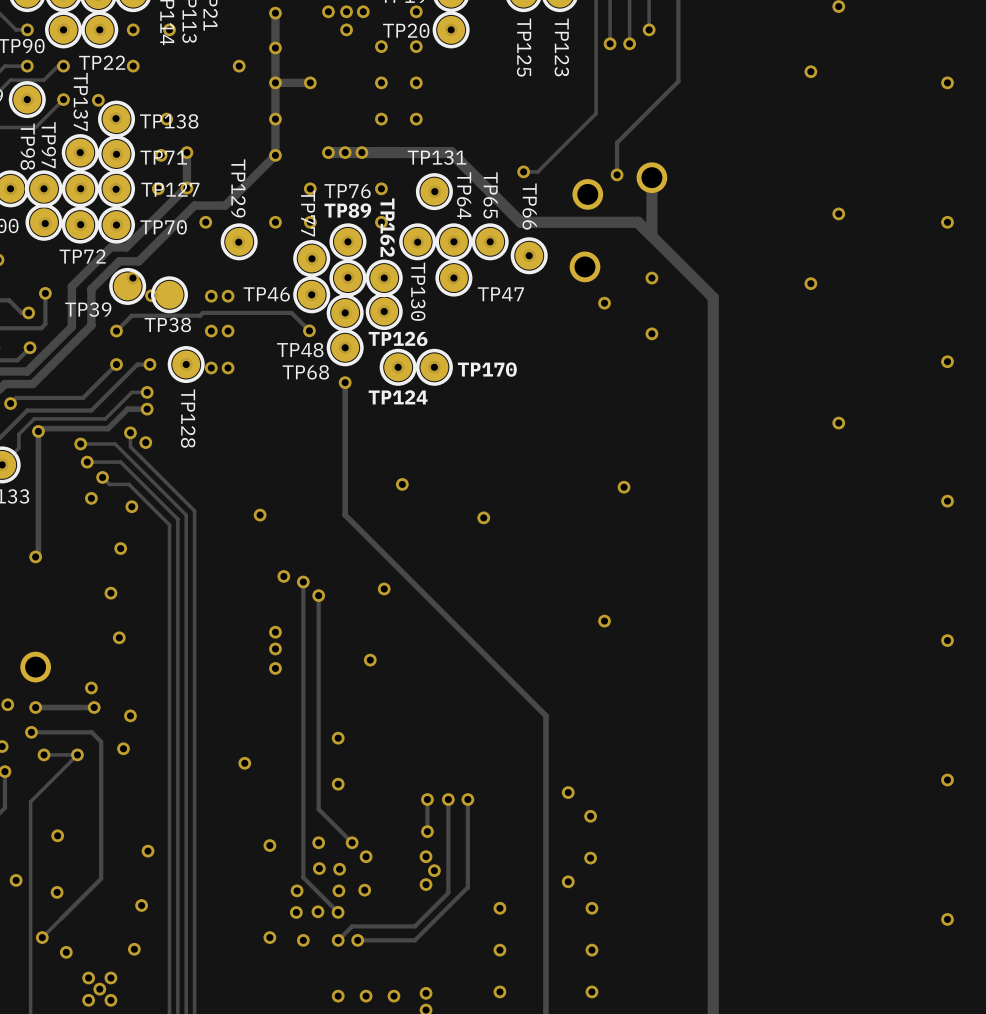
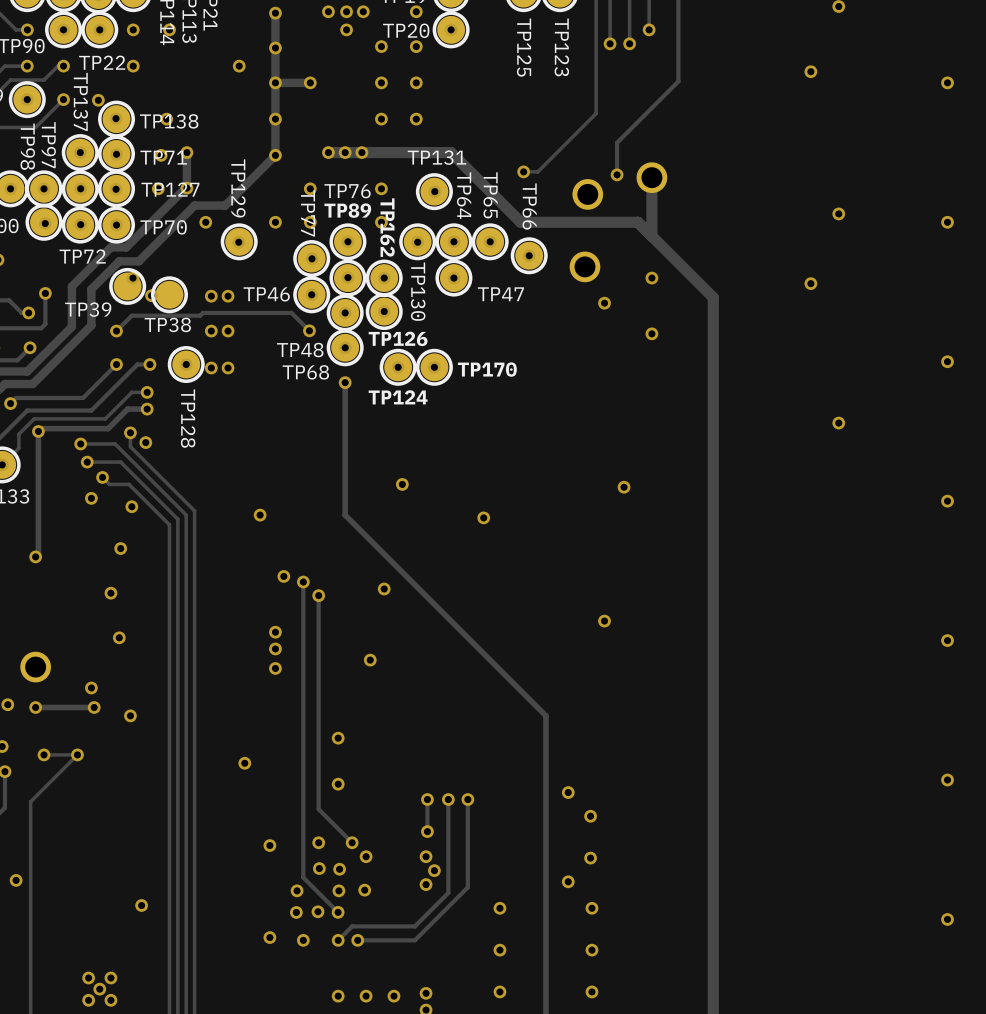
track: (31, 732) (91, 732) (101, 741) (101, 878) (42, 937) -> none
via: (31, 732) -> none
via: (123, 748) -> none
via: (57, 835) -> none
via: (148, 851) -> none
via: (57, 892) -> none
via: (42, 937) -> none
via: (134, 949) -> none
via: (66, 952) -> none

